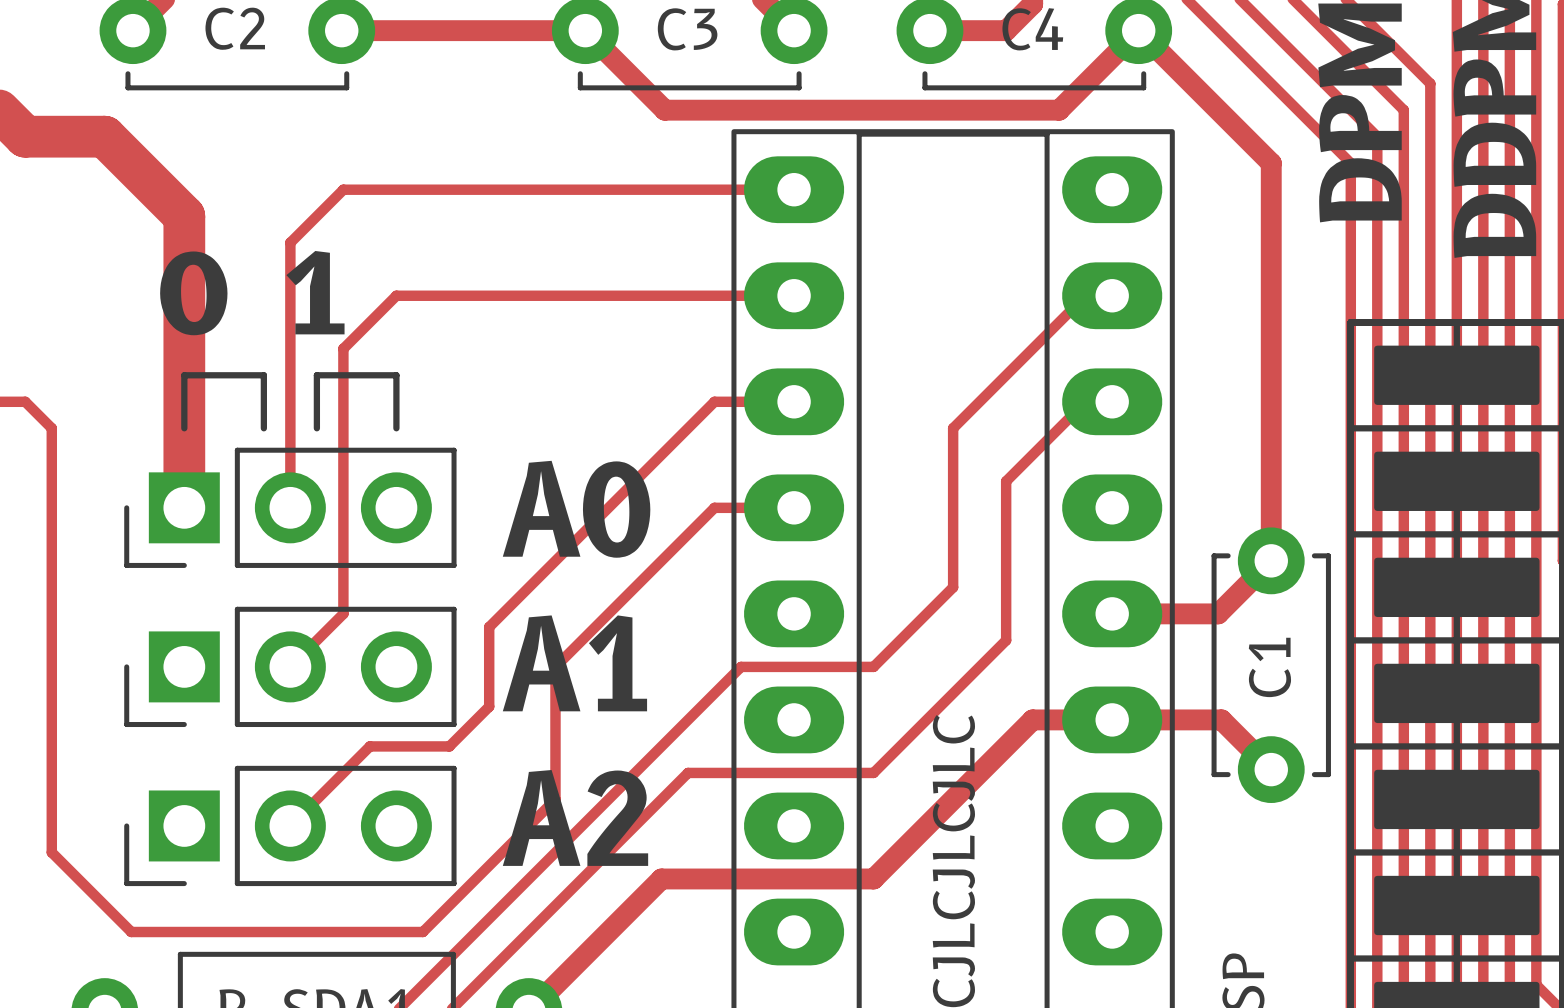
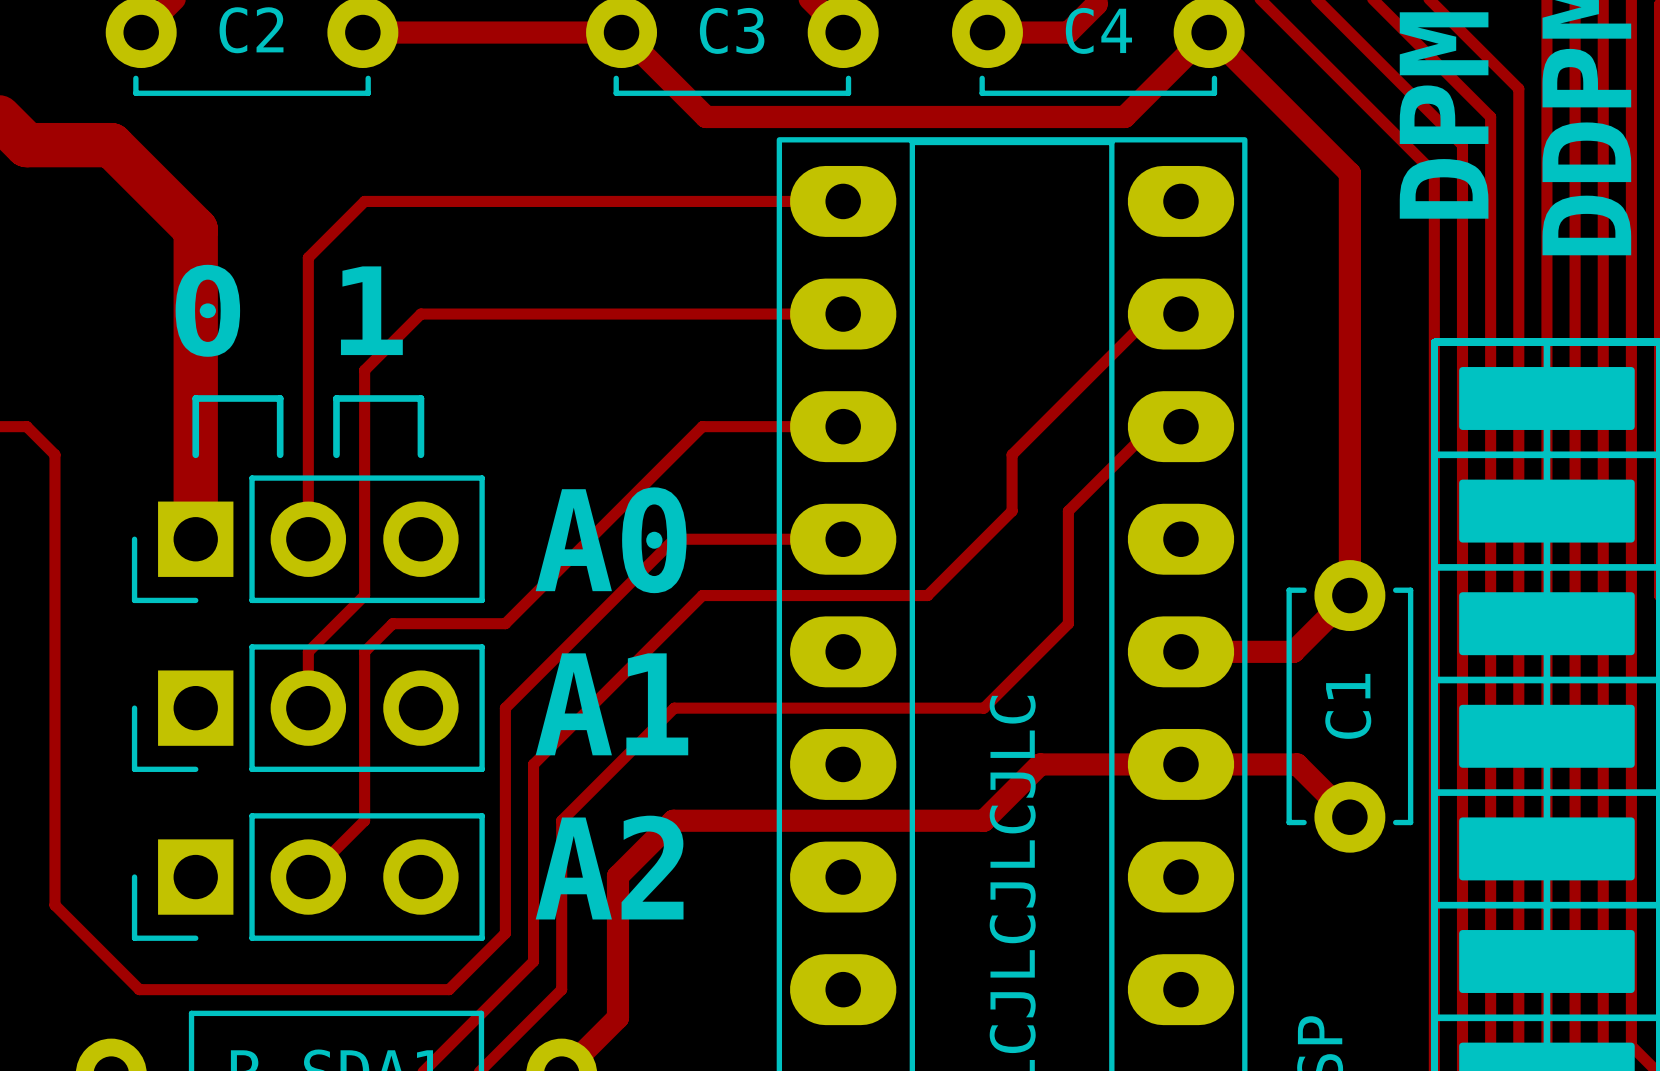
track: (714, 401) (489, 627) (489, 706) (449, 746) (369, 746) (343, 772) -> (758, 426) (702, 426) (505, 623) (392, 623) (364, 651) (364, 820)
track: (953, 481) (953, 587) (873, 666) -> (1012, 511) (927, 595) (702, 595)
track: (714, 507) (661, 560) -> (758, 539) (674, 539) (505, 708) (505, 933)
track: (343, 560) (343, 613) (290, 666) -> (364, 595) (308, 651) (308, 708)
track: (1006, 587) (1006, 640) (873, 772) -> (1068, 623) (983, 708) (927, 708)
track: (555, 666) (555, 799) (475, 878) -> (589, 708) (533, 764) (533, 961)
track: (741, 666) (502, 905) -> (786, 708) (674, 708) (561, 820) (561, 989)
track: (1032, 719) (873, 878) (661, 878) (581, 958) -> (1096, 764) (1040, 764) (983, 820) (927, 820)
track: (688, 772) (528, 932) -> (730, 820) (673, 820) (617, 876) (617, 1017)
track width: thin (688, 772) (873, 772) -> thick (730, 820) (927, 820)

